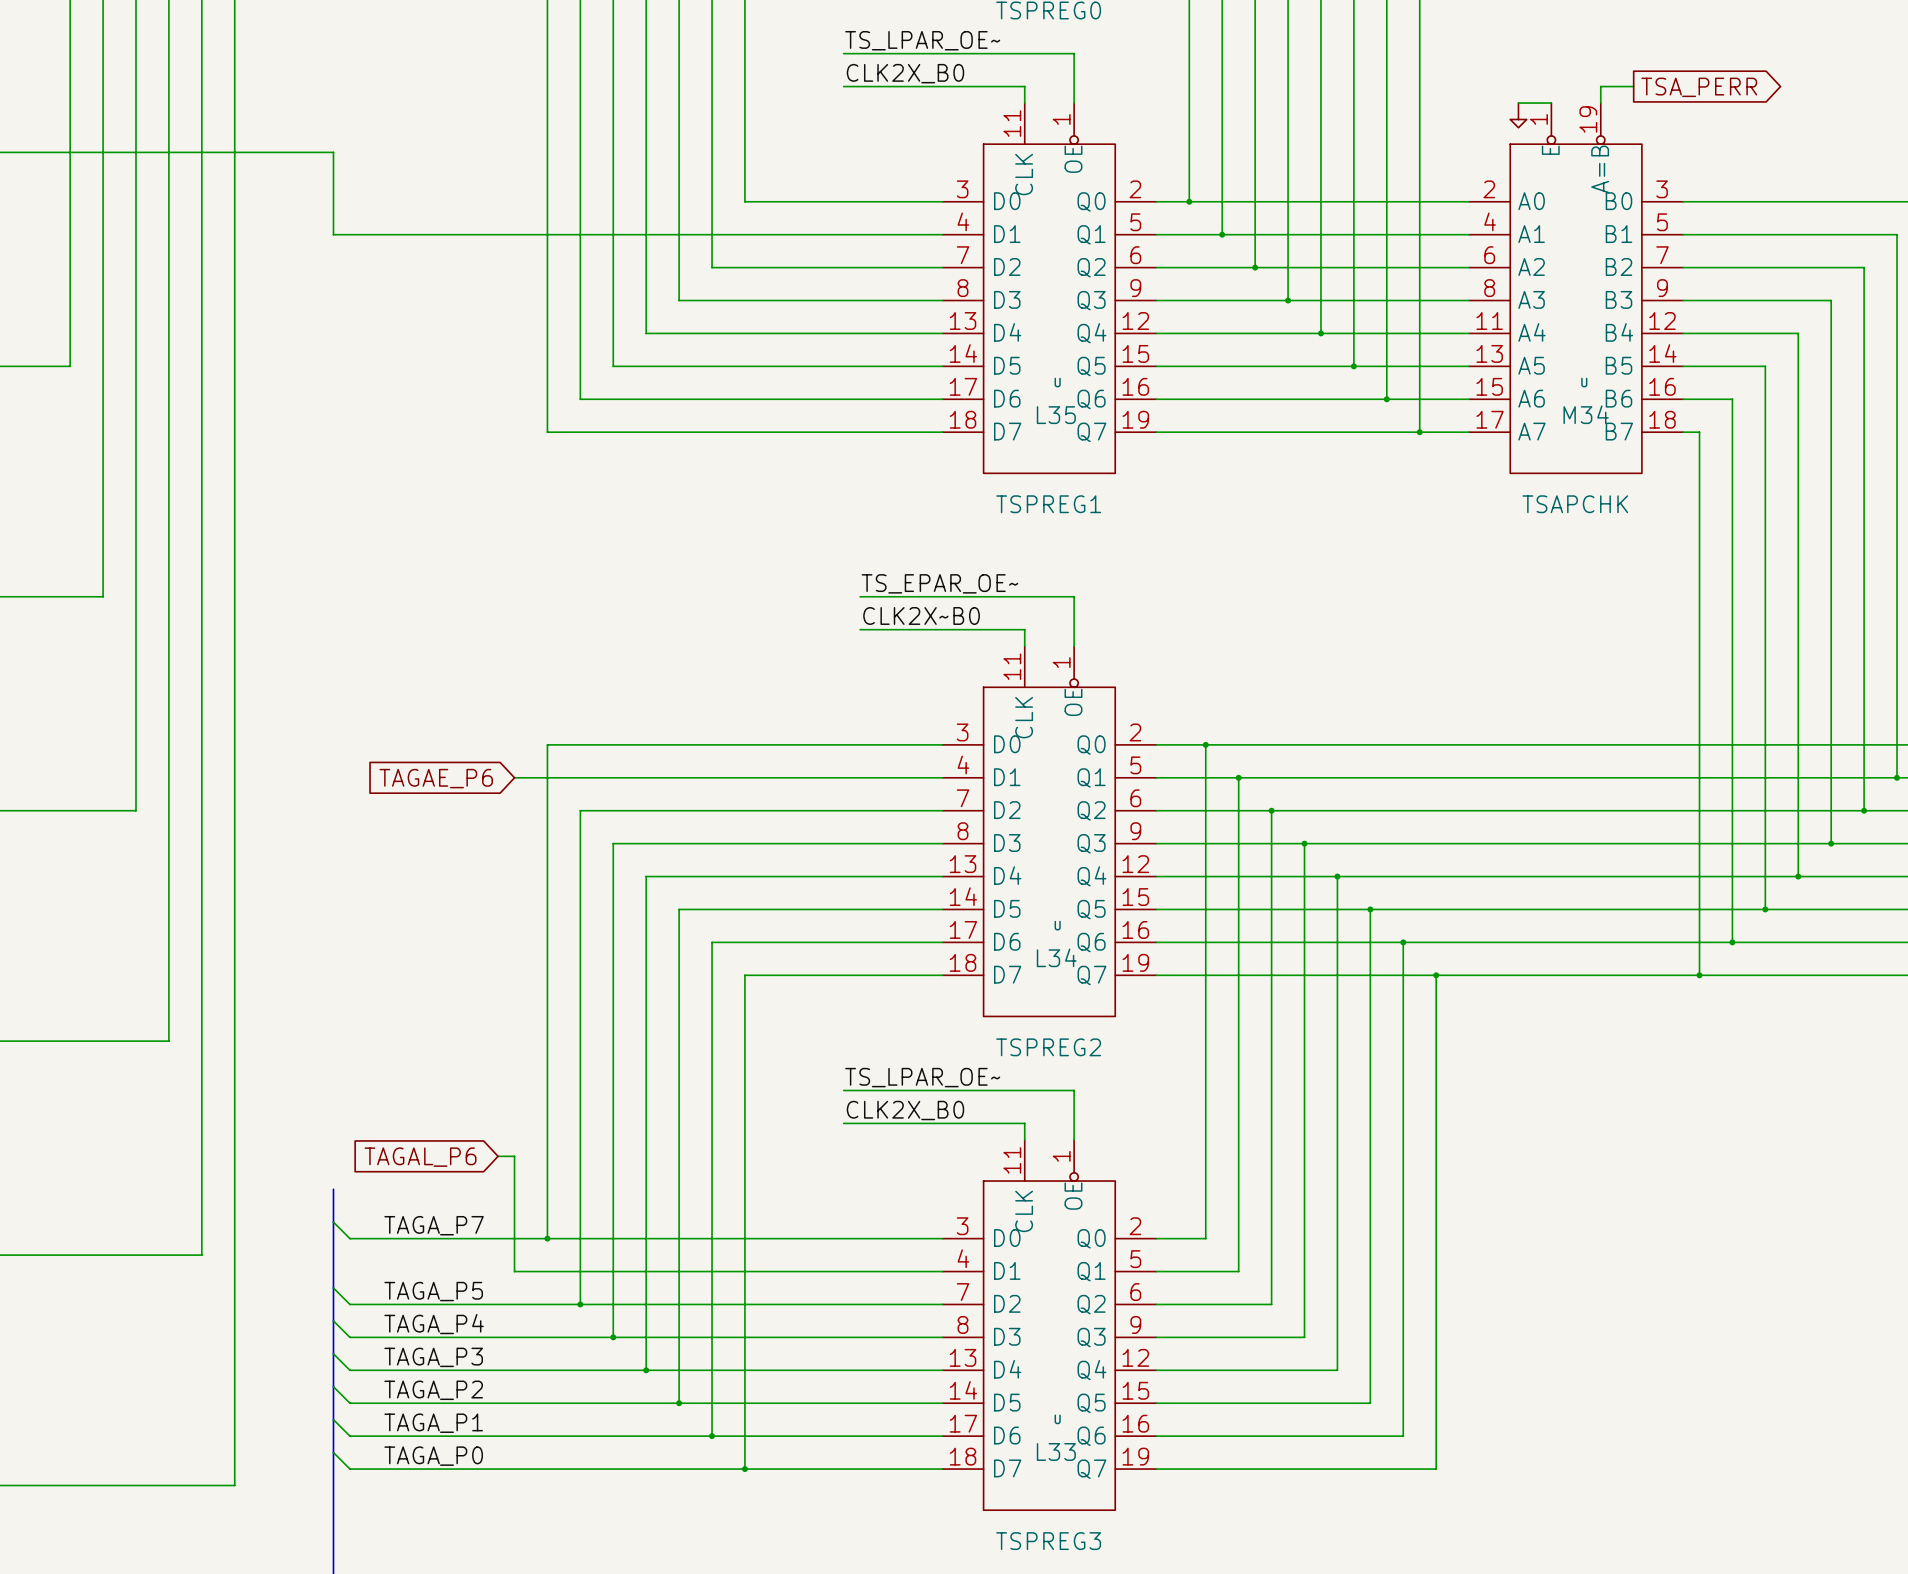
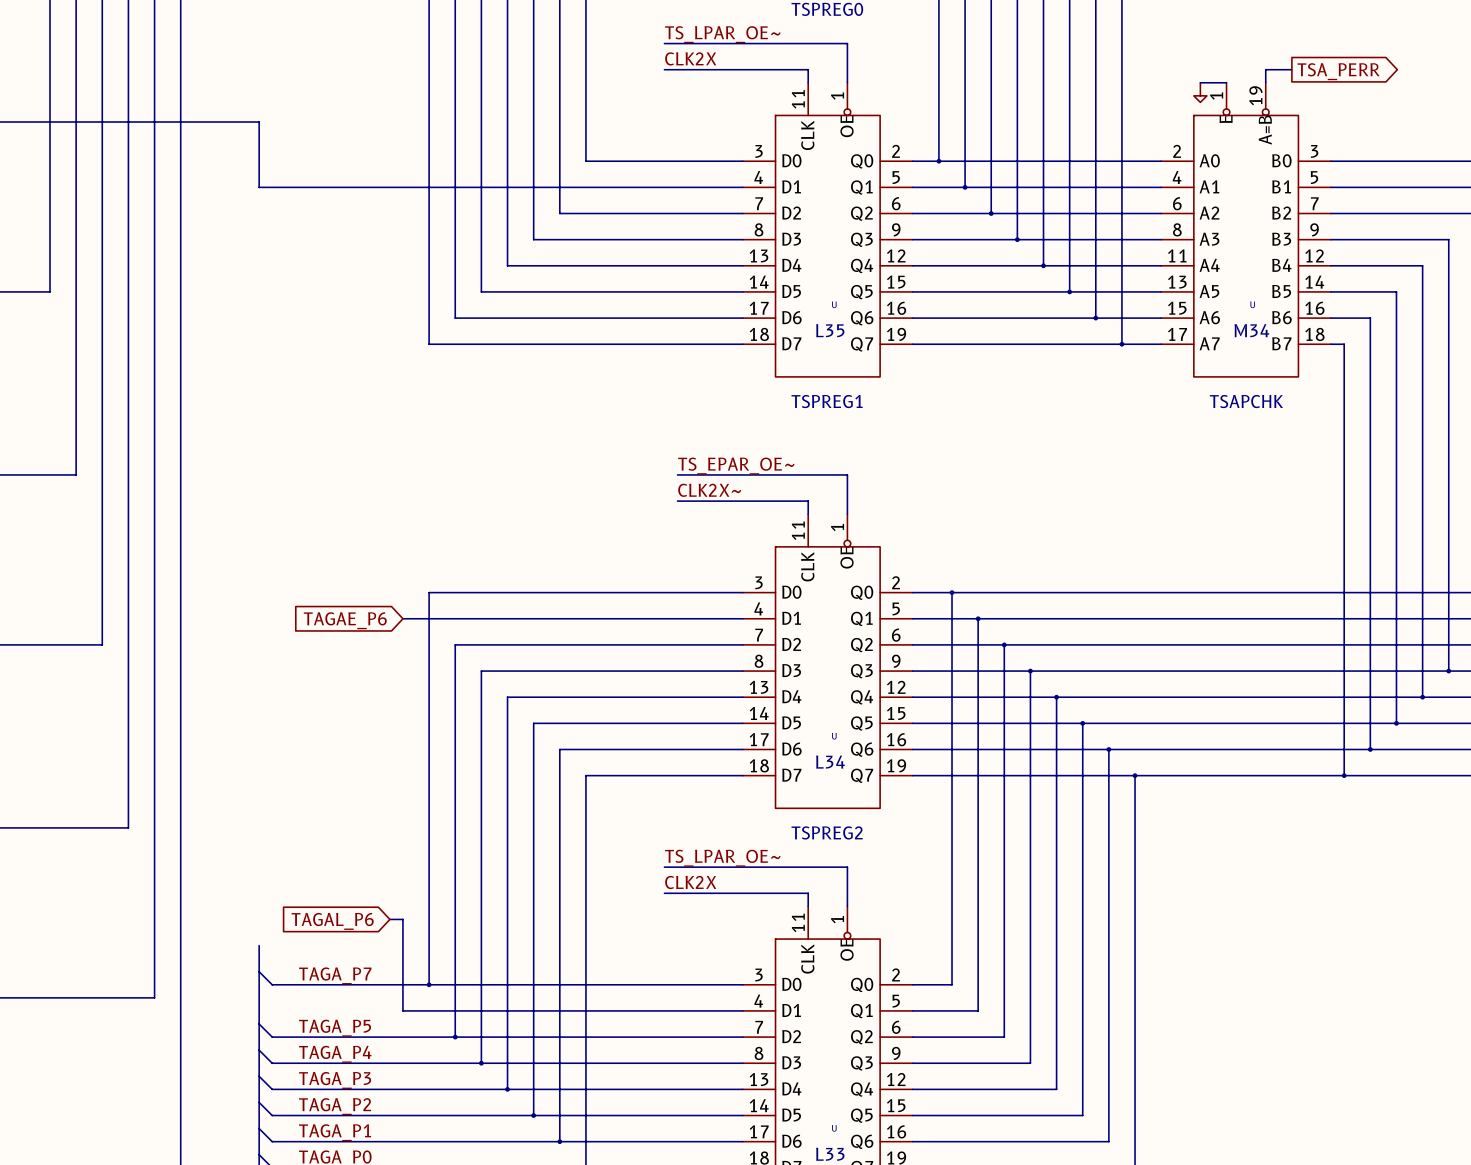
label: CLK2X_B0 (905, 73) -> CLK2X (690, 58)
label: CLK2X~B0 (921, 615) -> CLK2X~ (709, 490)
label: CLK2X_B0 (905, 1110) -> CLK2X (690, 882)

